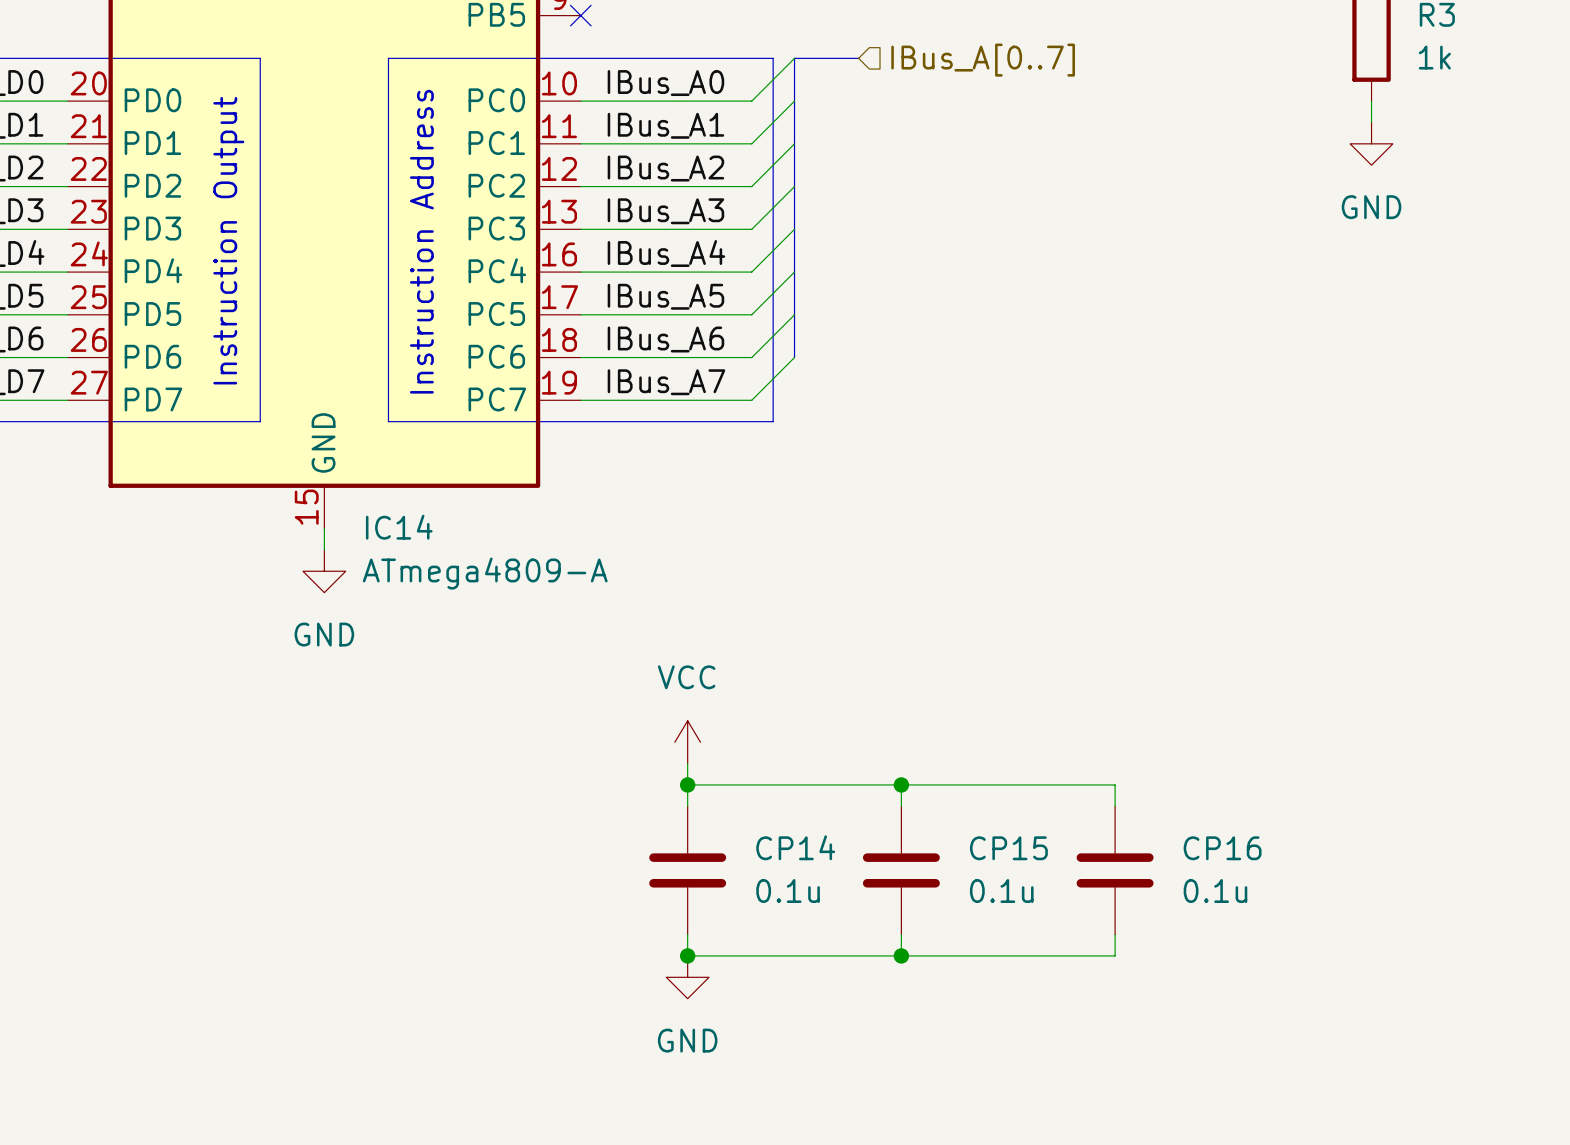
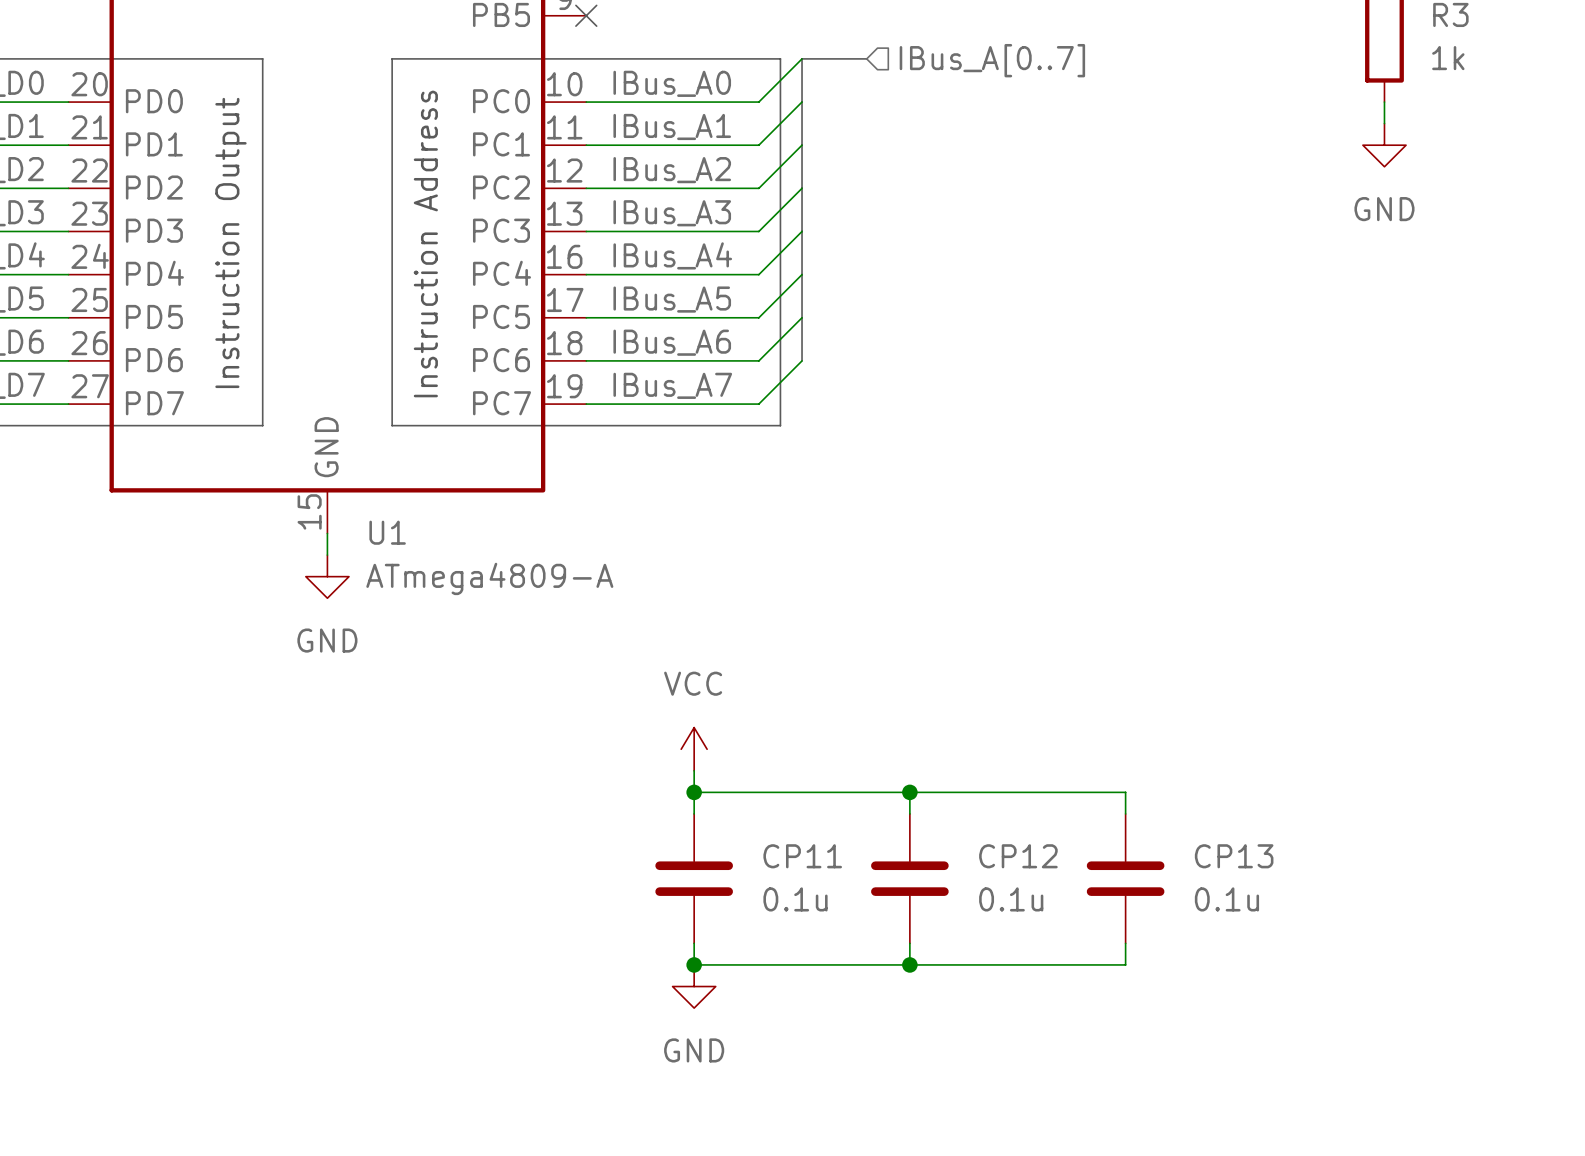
IC14 name: IC14 (399, 527) -> U1 (387, 532)
CP14 name: CP14 (795, 847) -> CP11 (802, 856)
CP15 name: CP15 (1008, 848) -> CP12 (1018, 856)
CP16 name: CP16 (1222, 848) -> CP13 (1234, 856)

